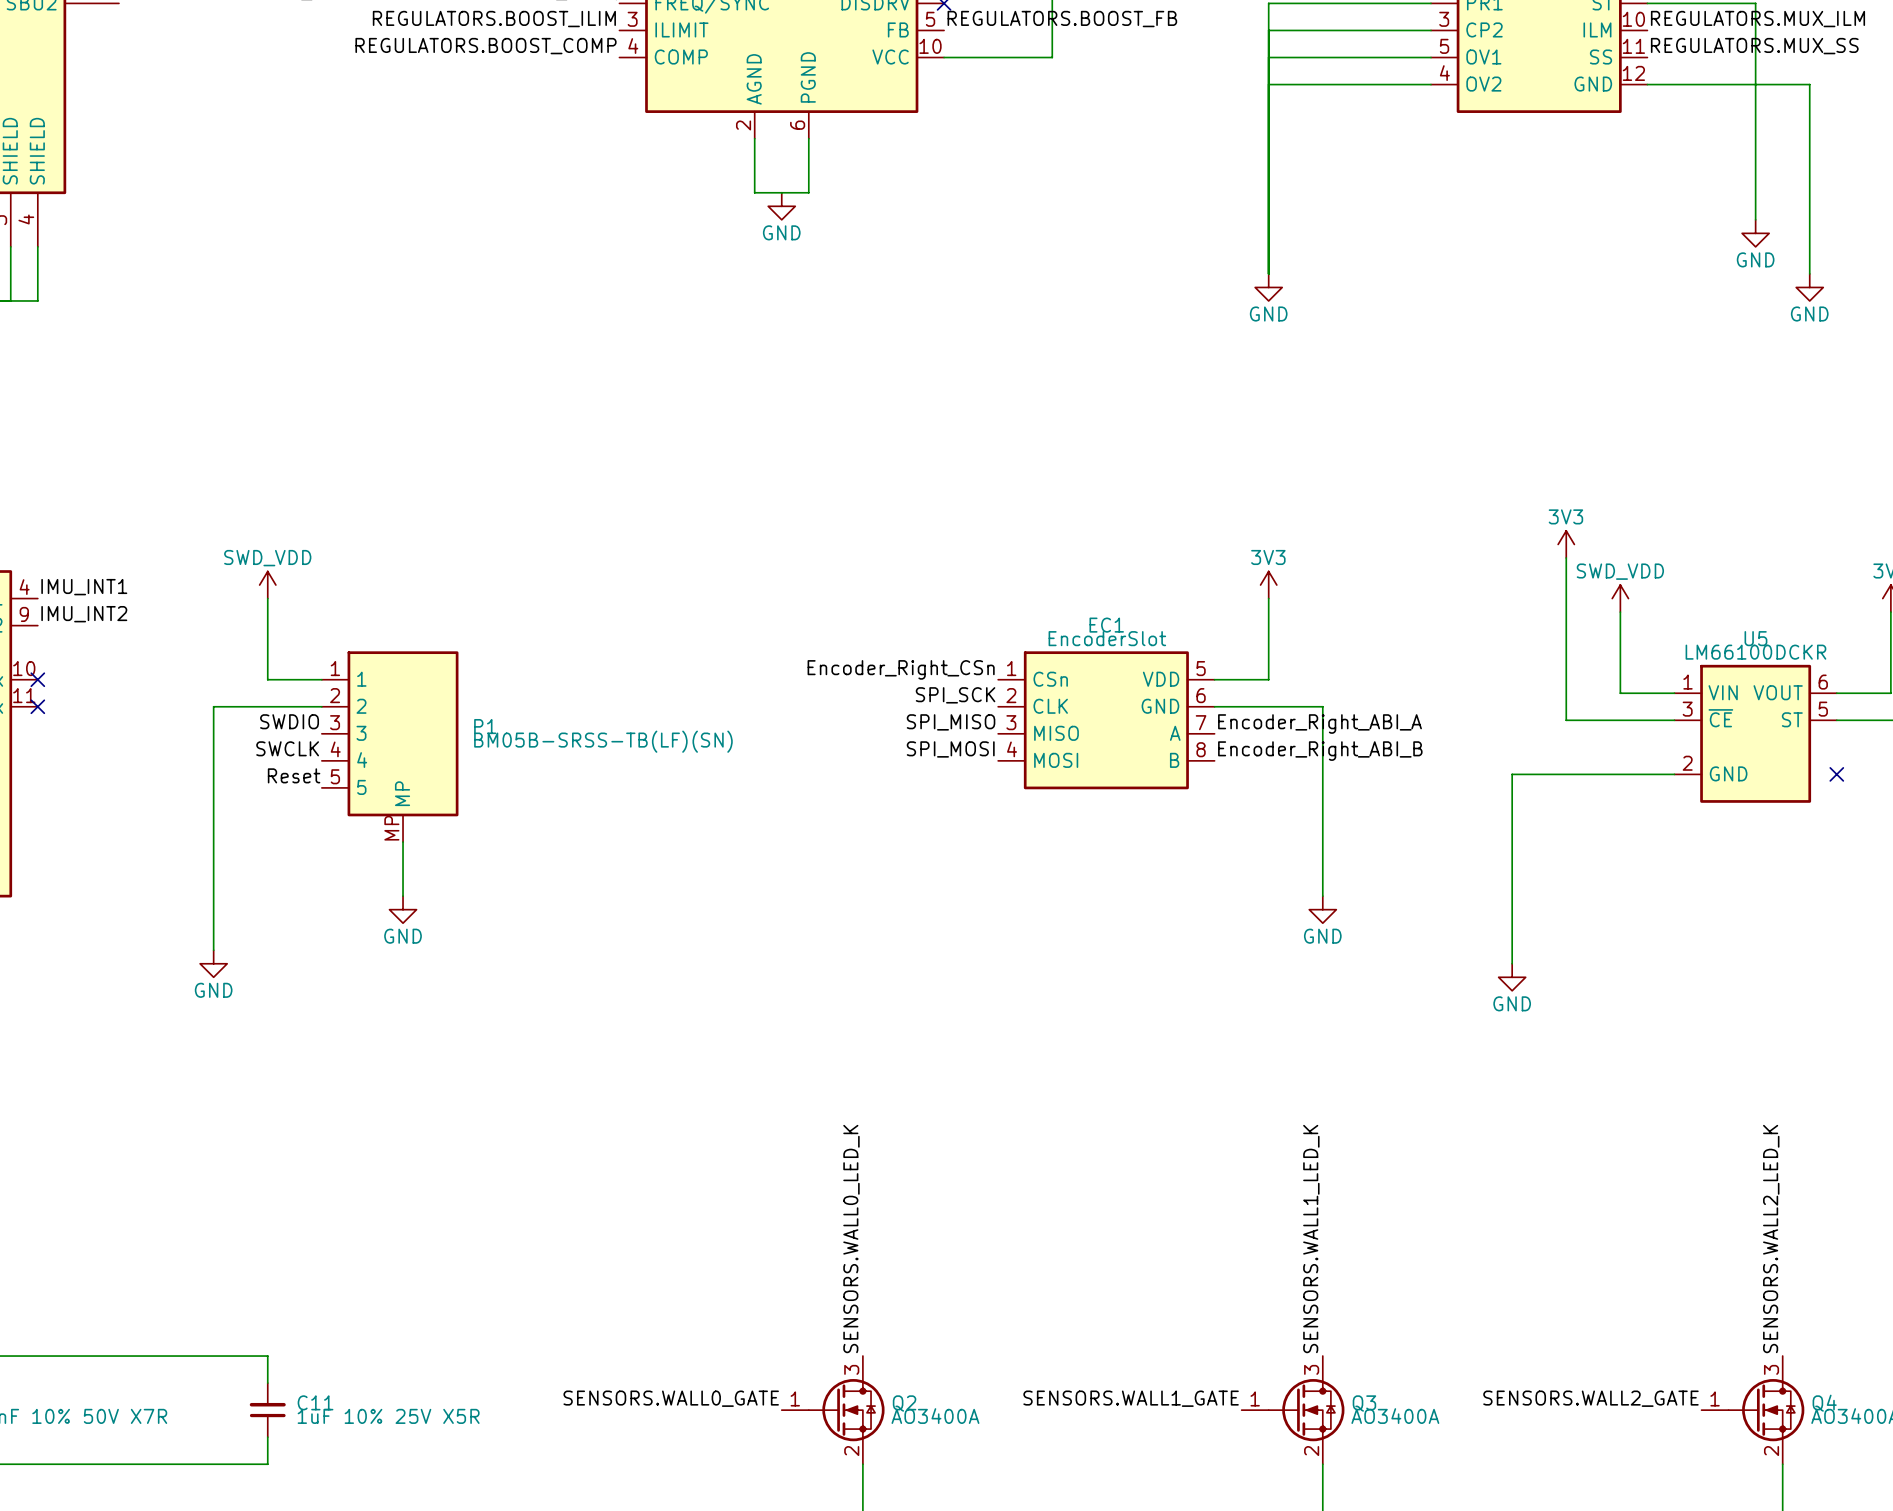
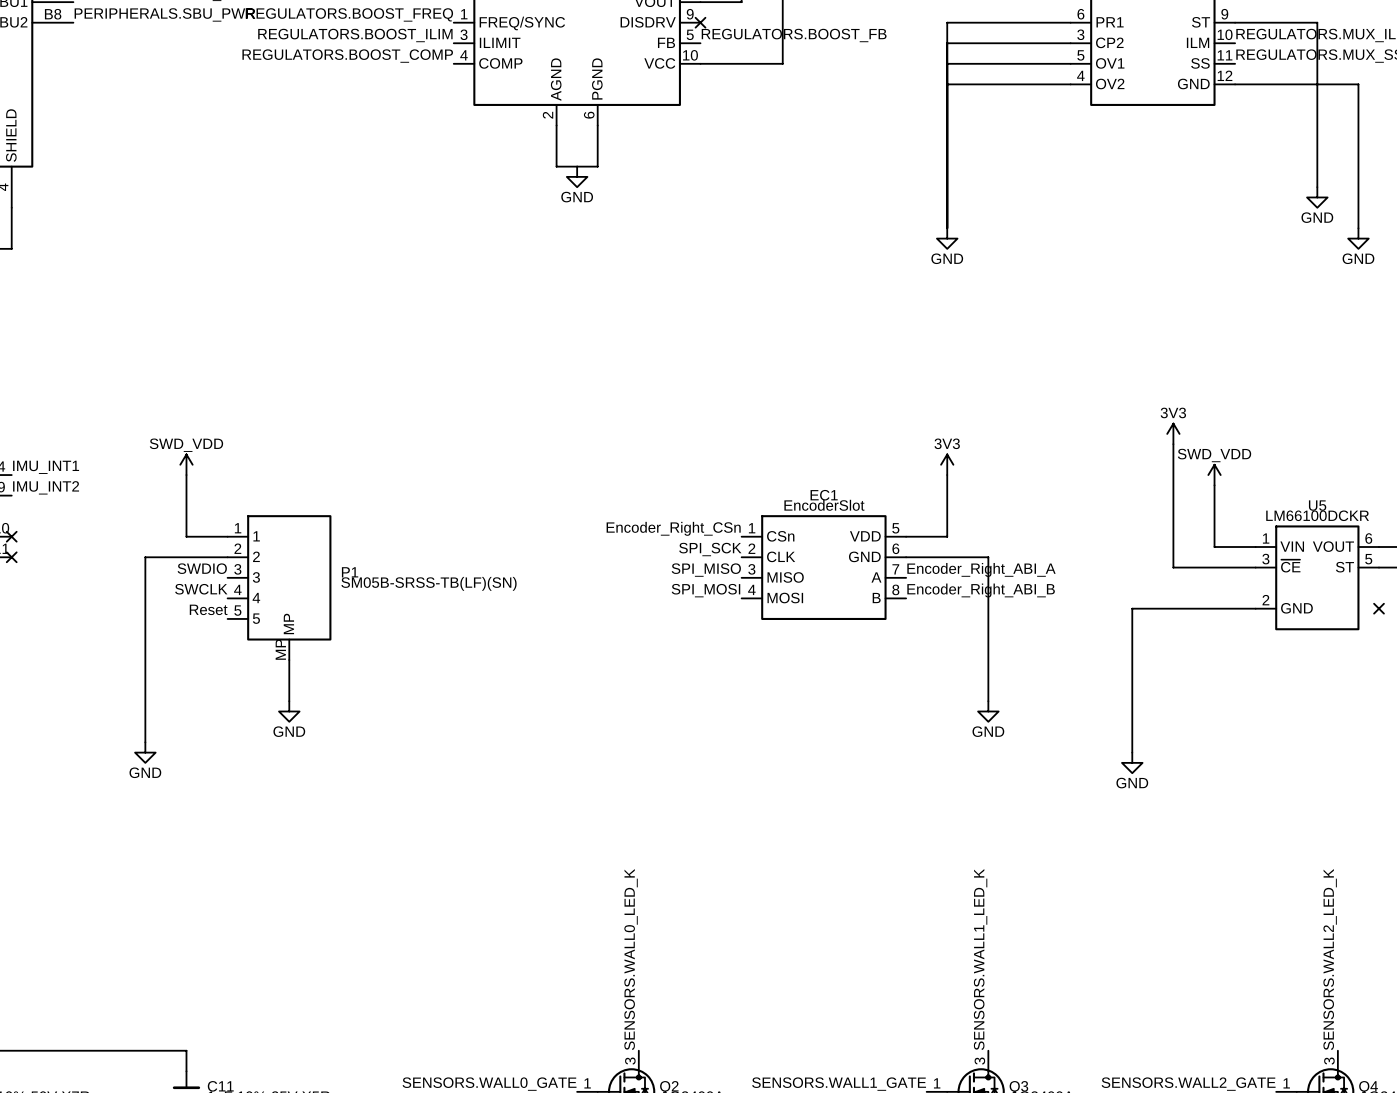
P1 value: BM05B-SRSS-TB(LF)(SN) (603, 741) -> SM05B-SRSS-TB(LF)(SN) (428, 583)

